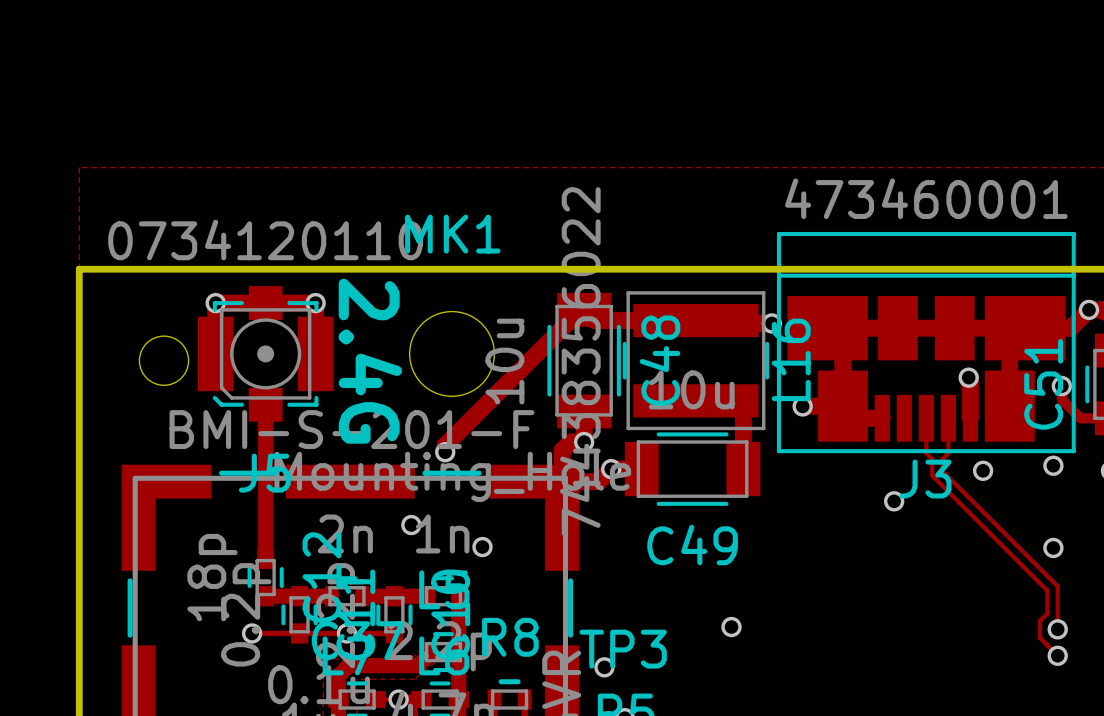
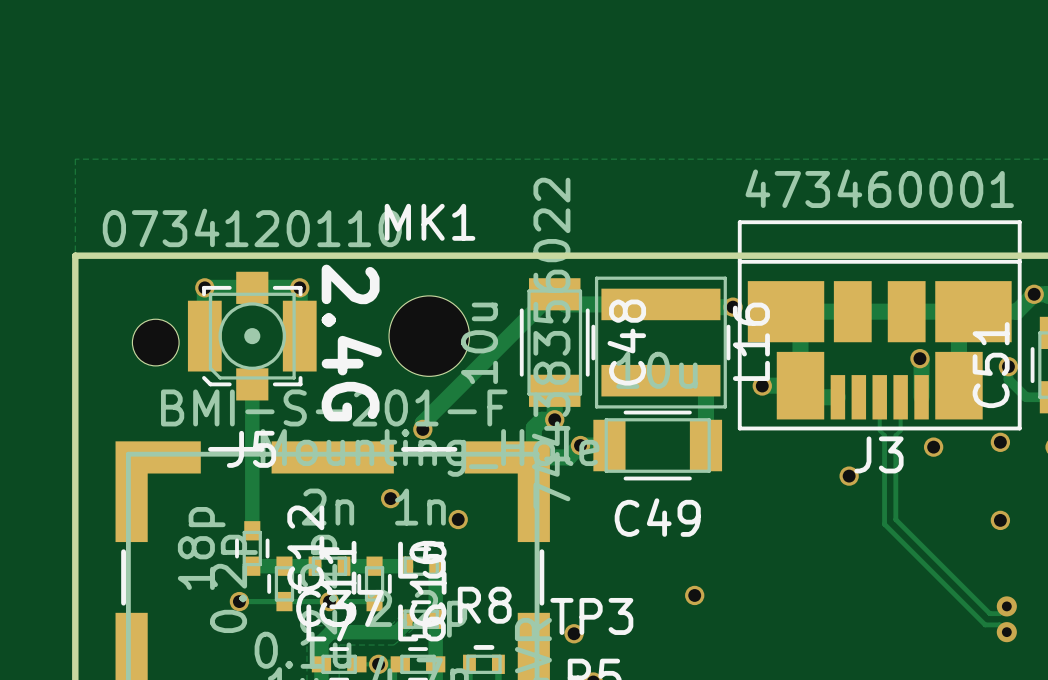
track: (931, 458) (932, 475) (1047, 590) (1047, 613) (1040, 620) (1040, 637) (1057, 655) -> (884, 435) (884, 524) (985, 624) (999, 624) (1006, 632)
track: (943, 458) (942, 471) (1057, 586) (1057, 629) -> (895, 435) (895, 519) (989, 613) (999, 613) (1006, 606)
via: (1057, 629) -> none
via: none -> (1006, 606)
via: (1057, 655) -> none
via: none -> (1006, 632)

